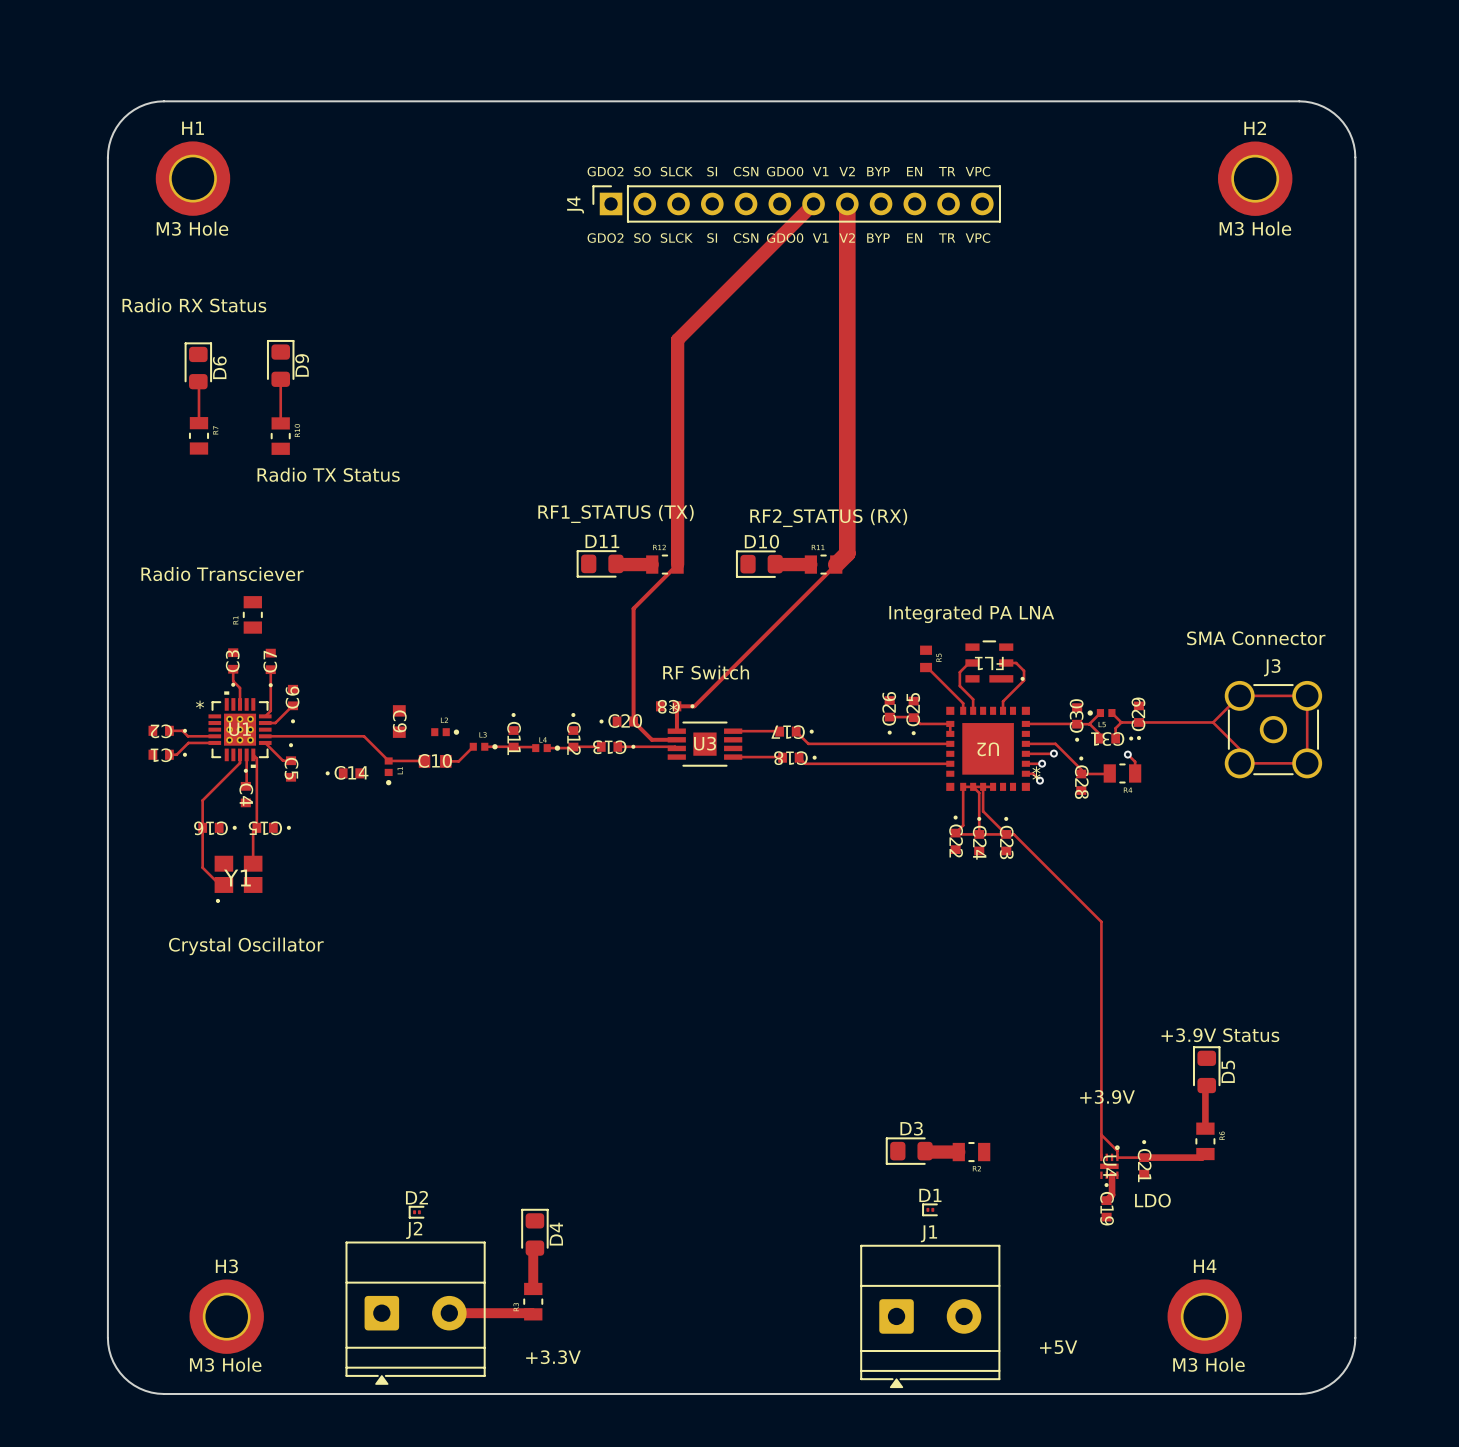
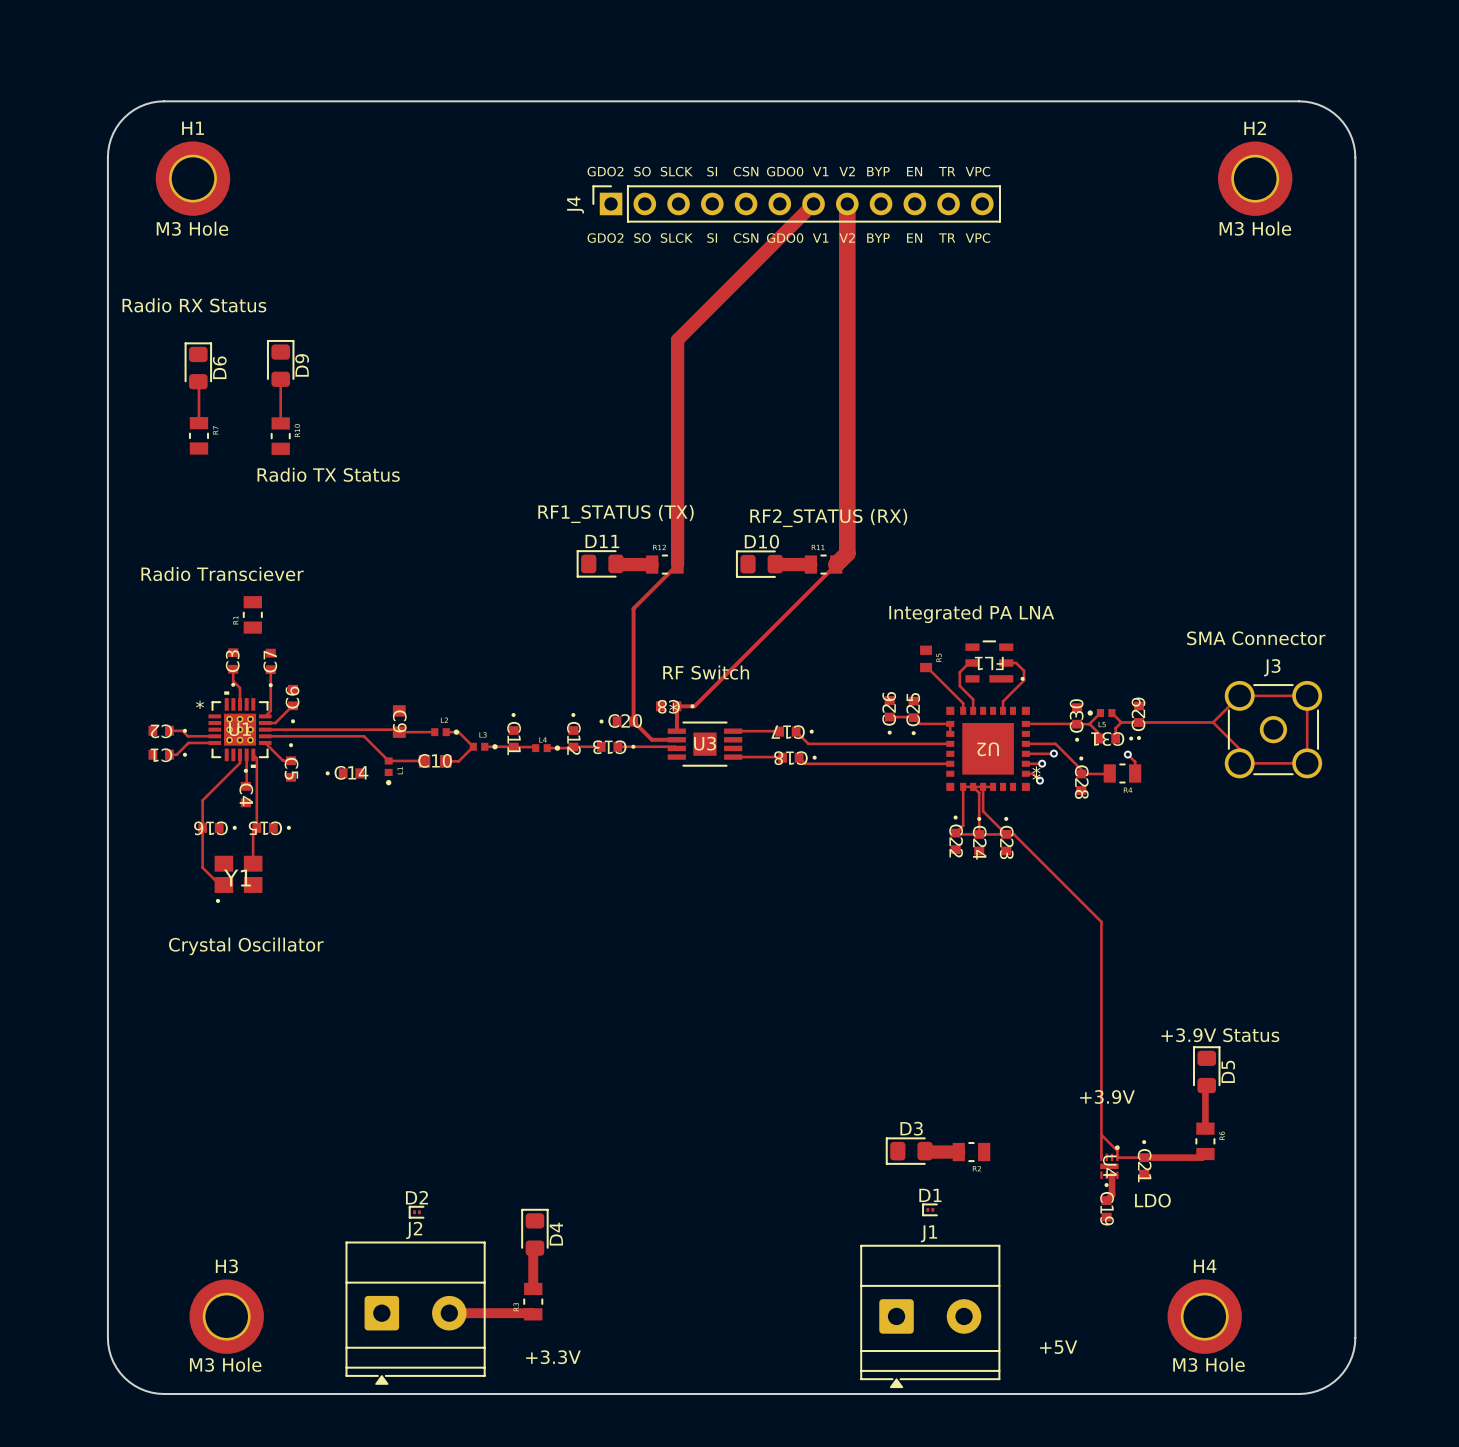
track: none -> (265, 729) (396, 729) (399, 732) (434, 732)
track: none -> (446, 732) (458, 732) (473, 746)

